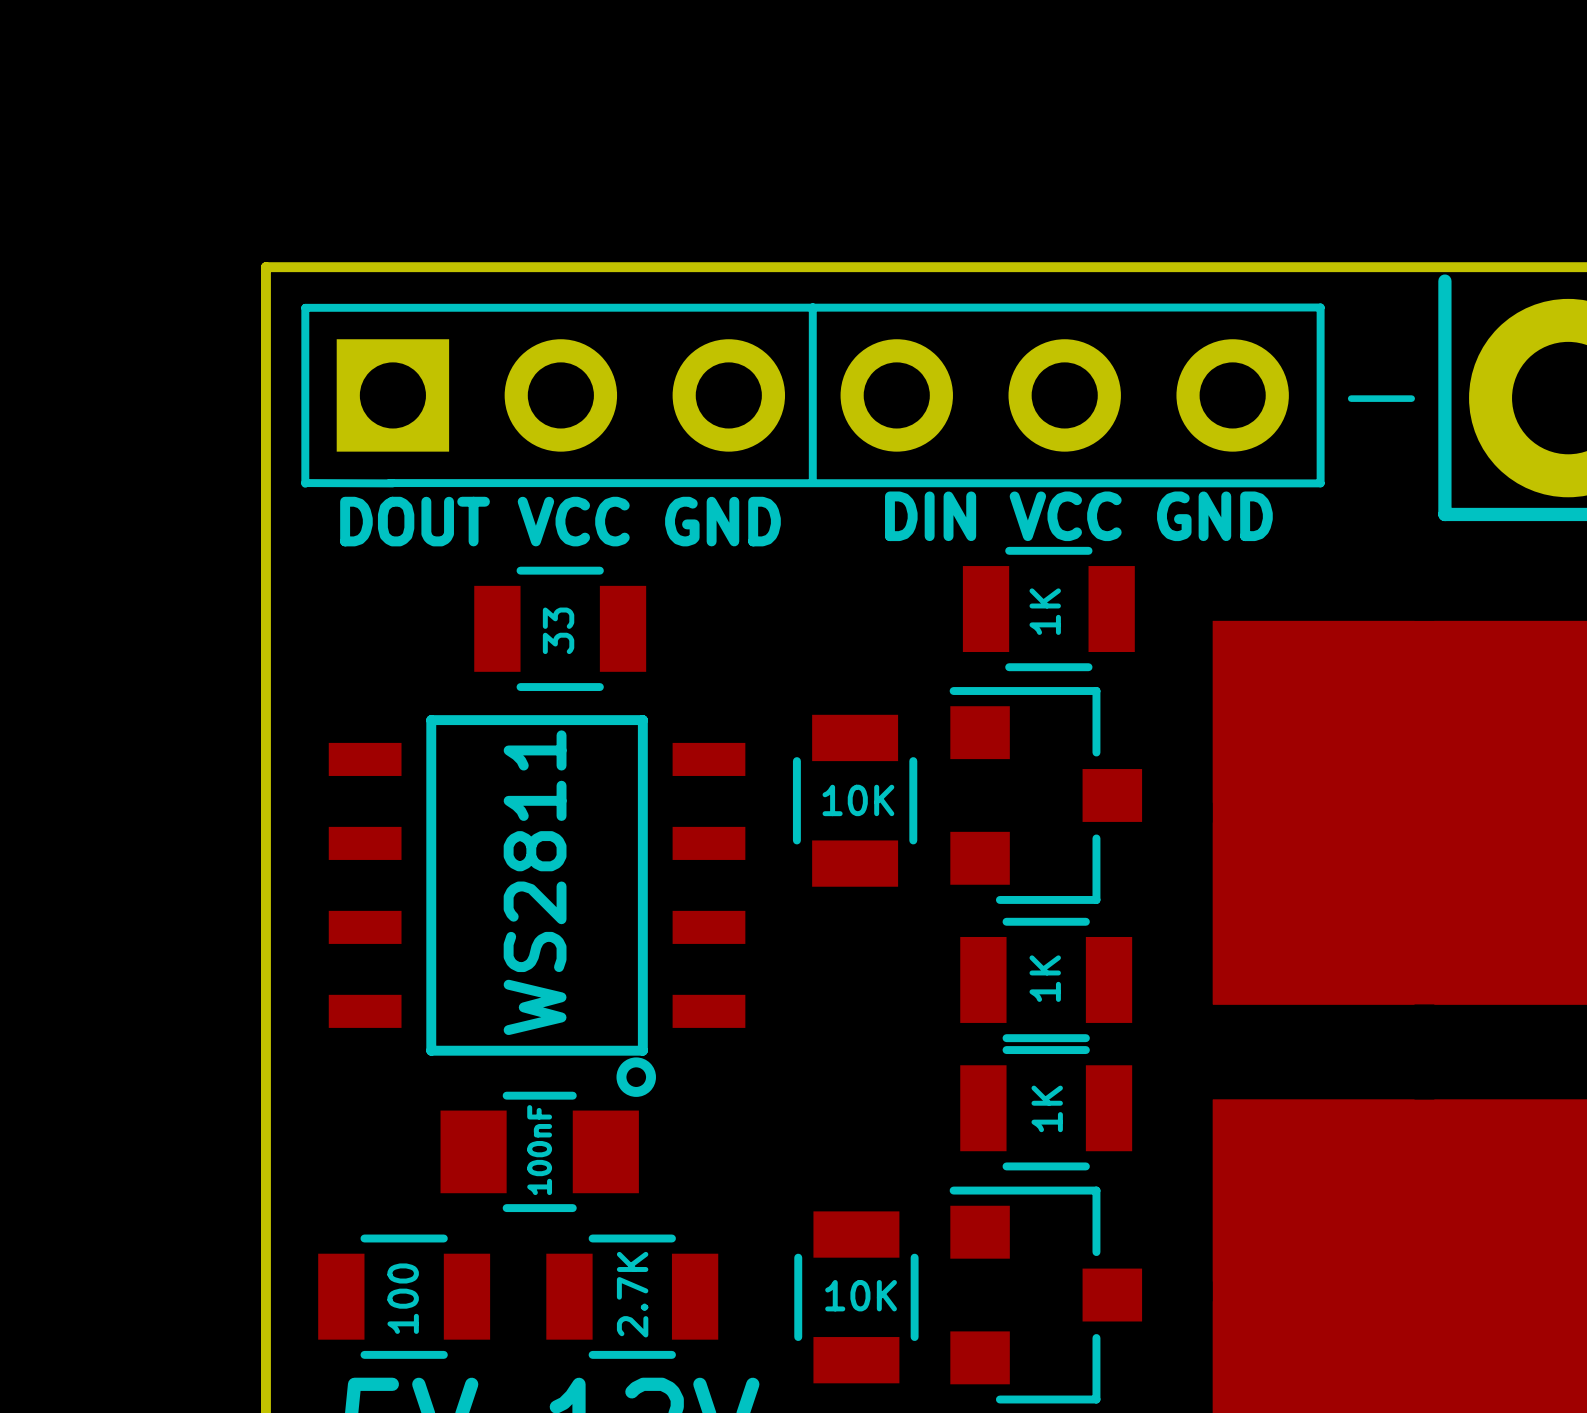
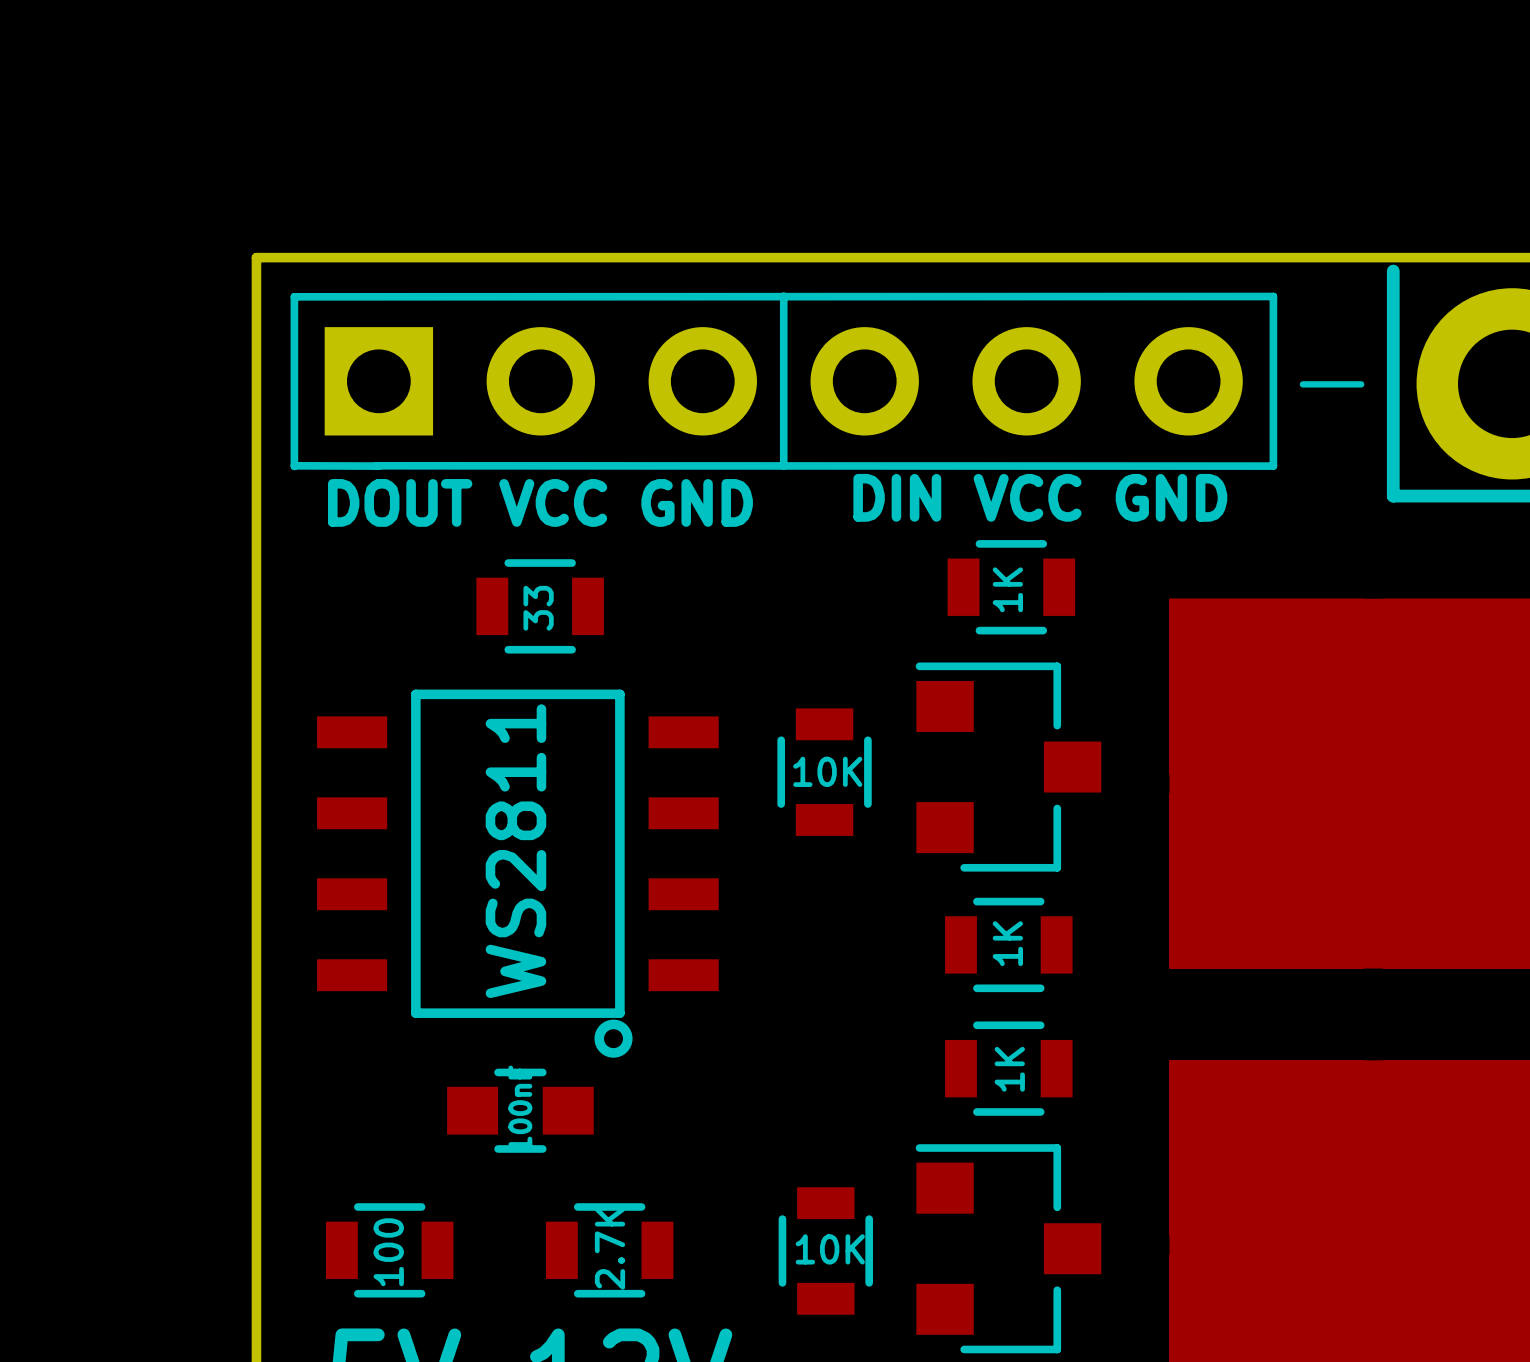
part footprint: [962, 546, 1135, 672] -> [947, 540, 1076, 635]
part footprint: [474, 566, 647, 692] -> [476, 559, 604, 654]
part footprint: [792, 714, 918, 887] -> [777, 708, 872, 836]
part footprint: [960, 917, 1133, 1043] -> [945, 897, 1073, 993]
part footprint: [960, 1046, 1133, 1171] -> [945, 1021, 1073, 1116]
part footprint: [440, 1091, 639, 1213] -> [447, 1068, 594, 1153]
part footprint: [794, 1211, 919, 1384] -> [778, 1187, 874, 1315]
part footprint: [318, 1234, 491, 1359] -> [325, 1203, 454, 1298]
part footprint: [546, 1234, 719, 1359] -> [545, 1203, 674, 1298]

